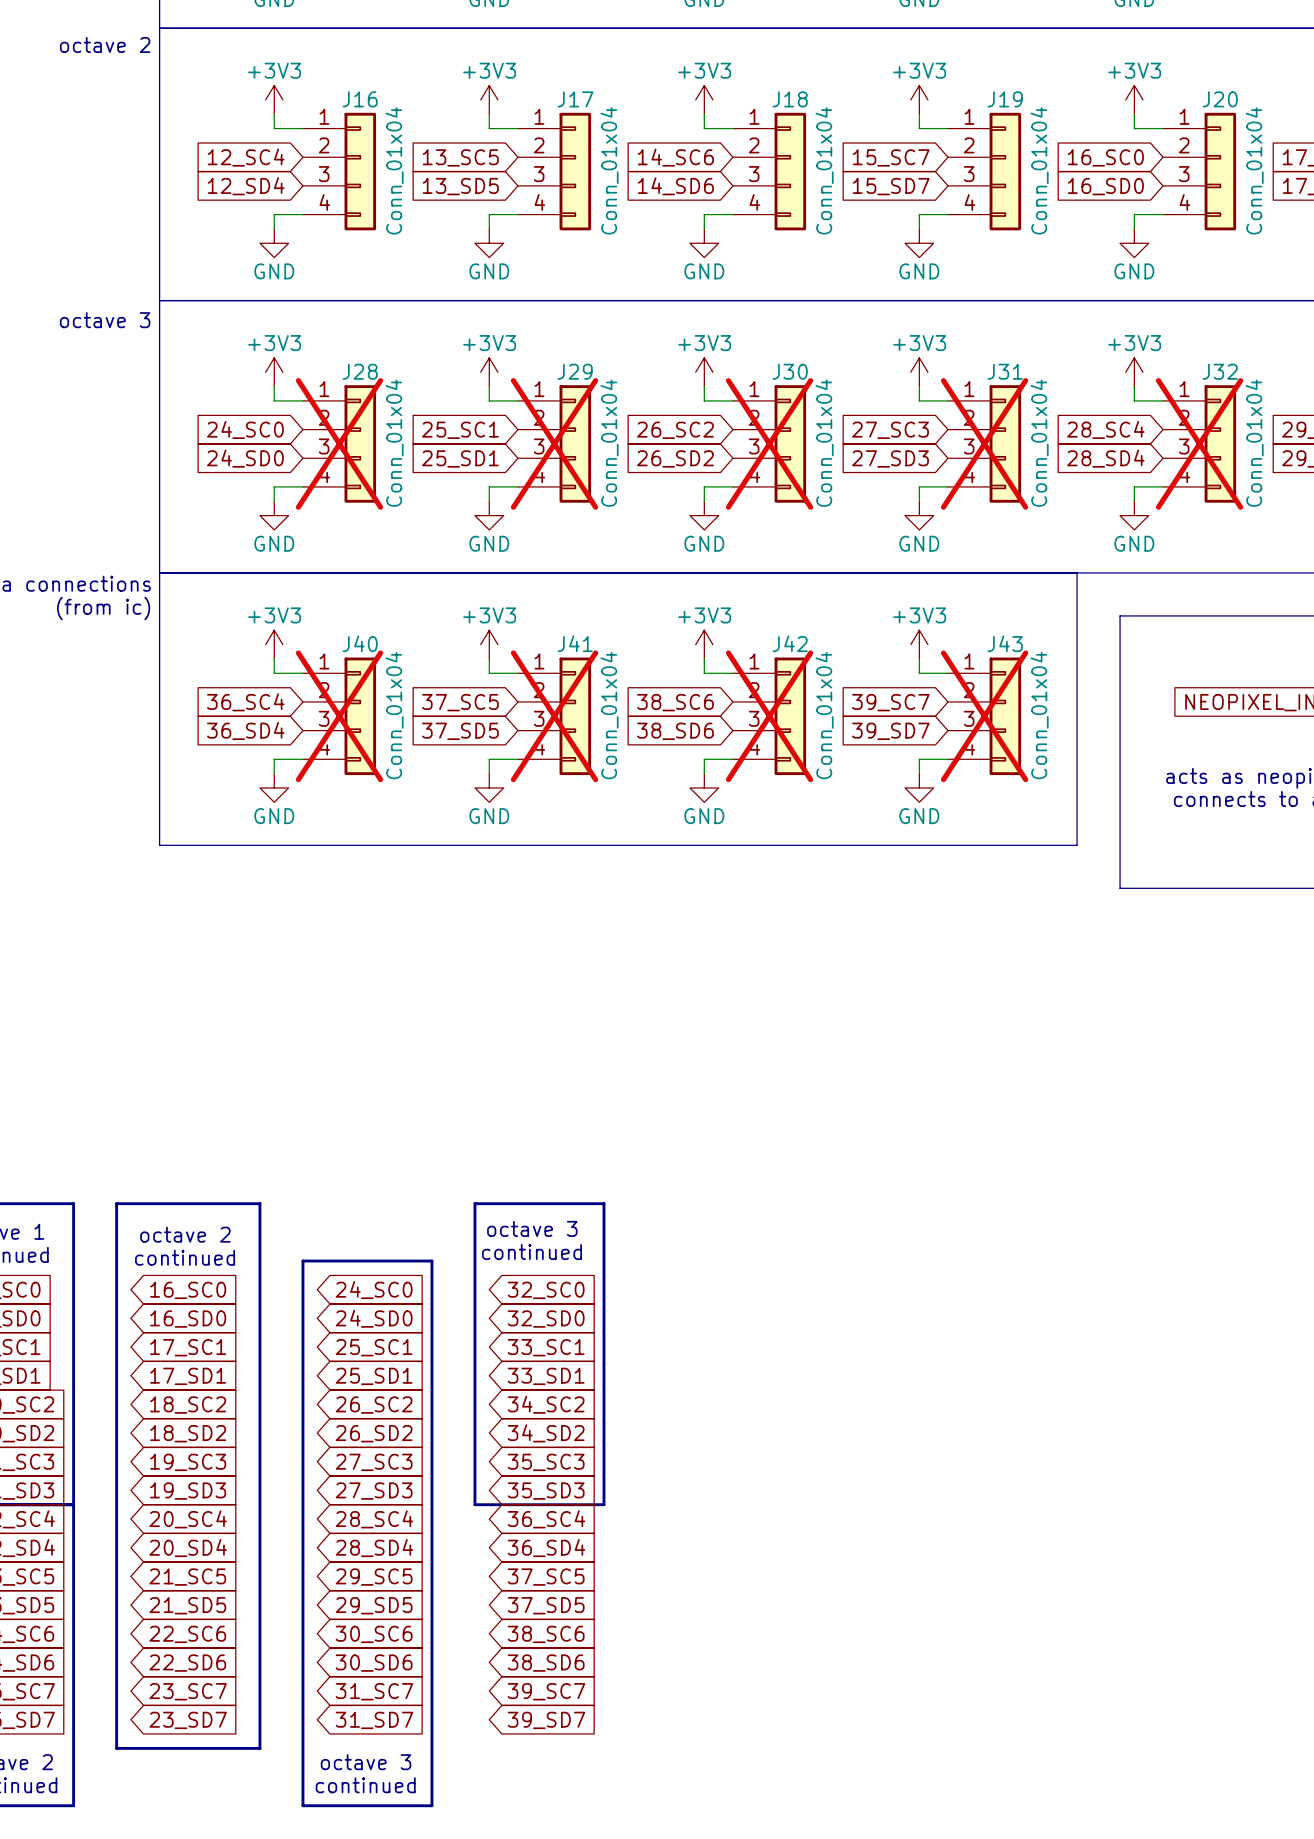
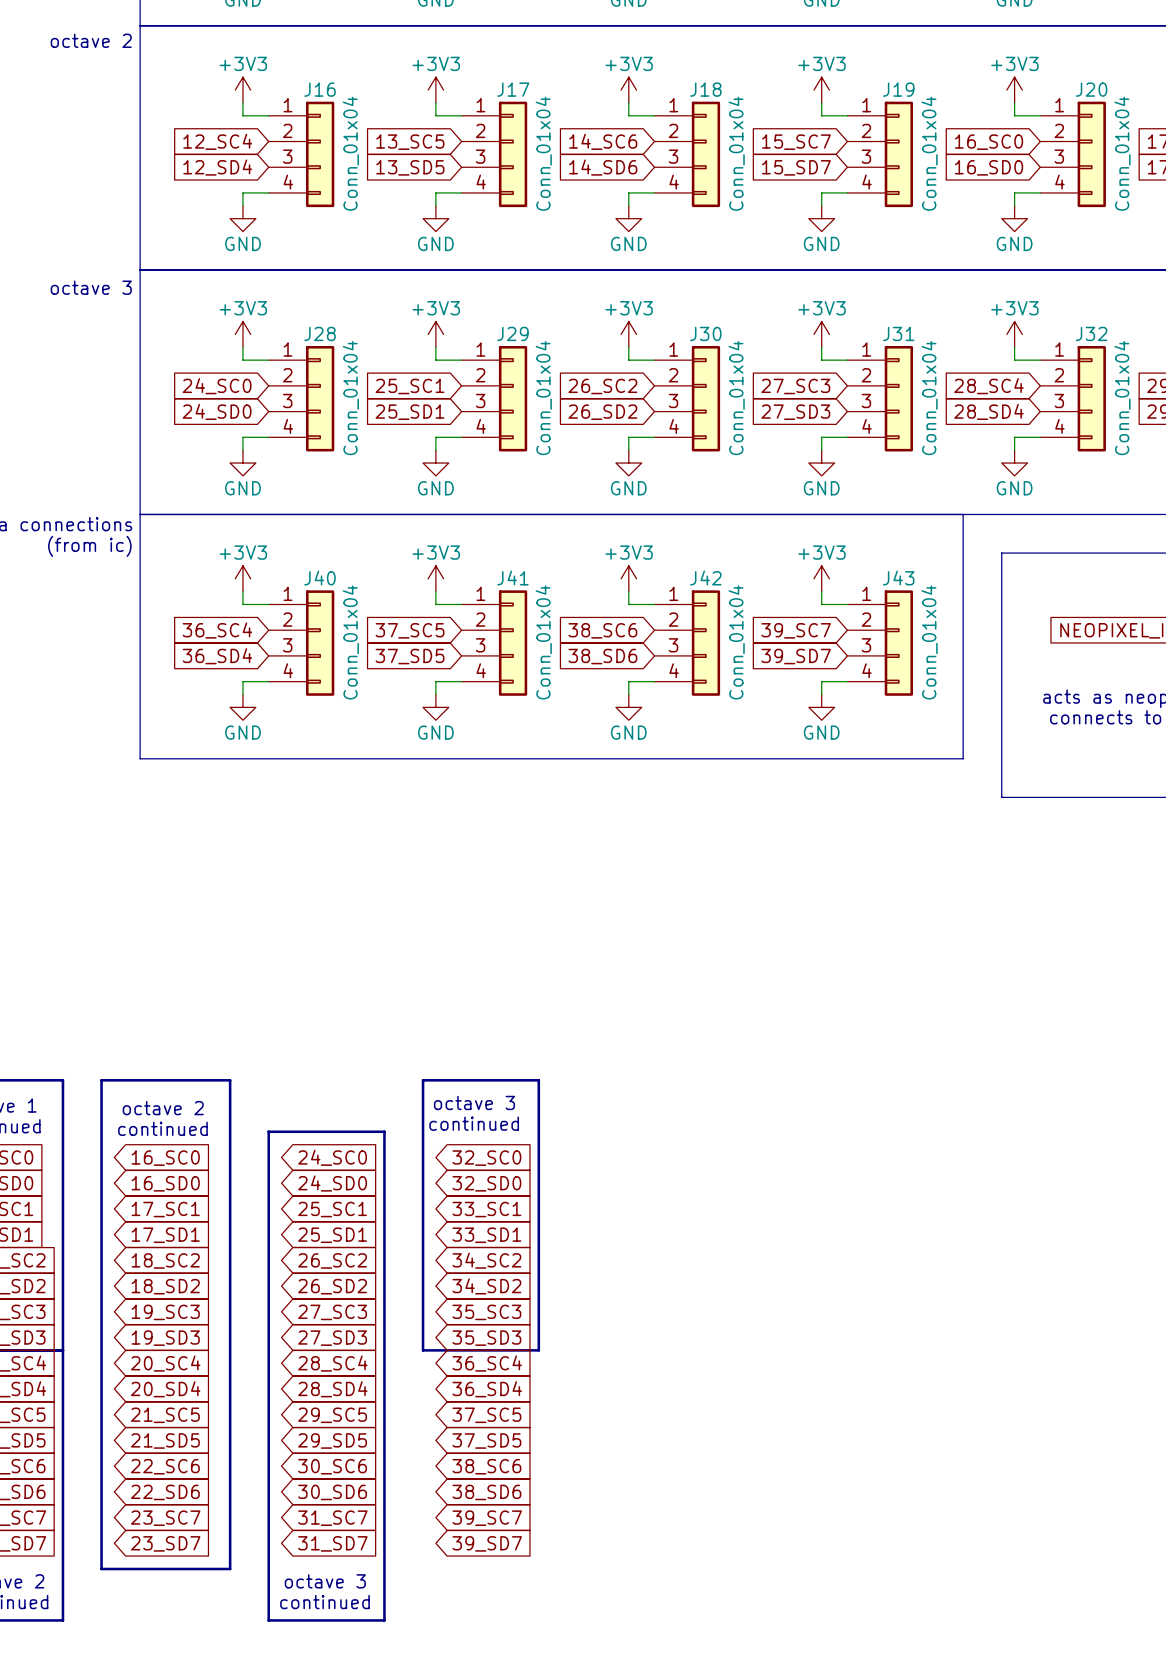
J28 do-not-place cross: (339, 443) -> none
J29 do-not-place cross: (554, 443) -> none
J30 do-not-place cross: (769, 443) -> none
J31 do-not-place cross: (984, 443) -> none
J32 do-not-place cross: (1199, 443) -> none
J40 do-not-place cross: (339, 716) -> none
J41 do-not-place cross: (554, 716) -> none
J42 do-not-place cross: (769, 716) -> none
J43 do-not-place cross: (984, 716) -> none

